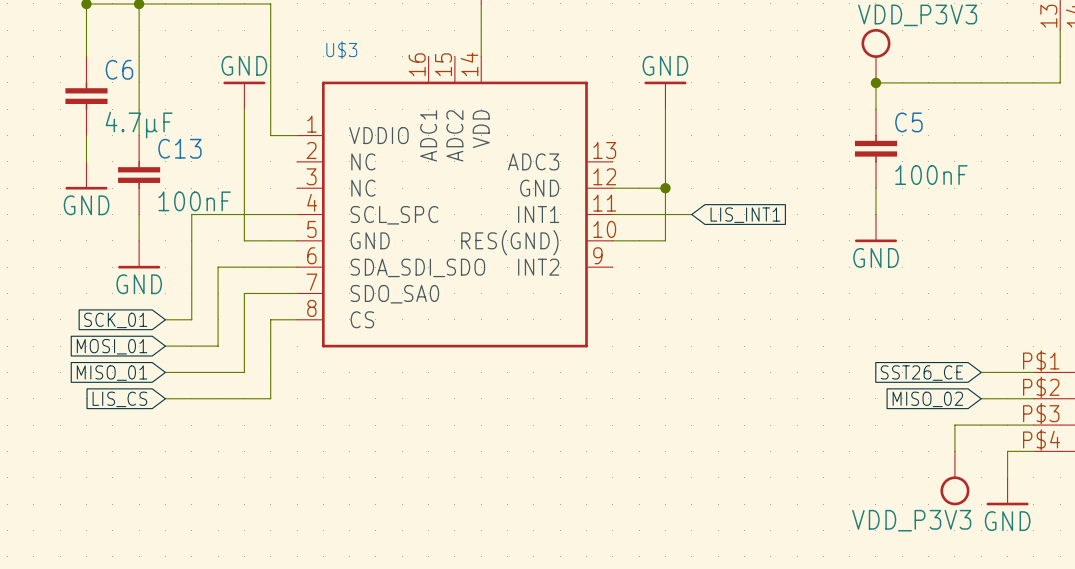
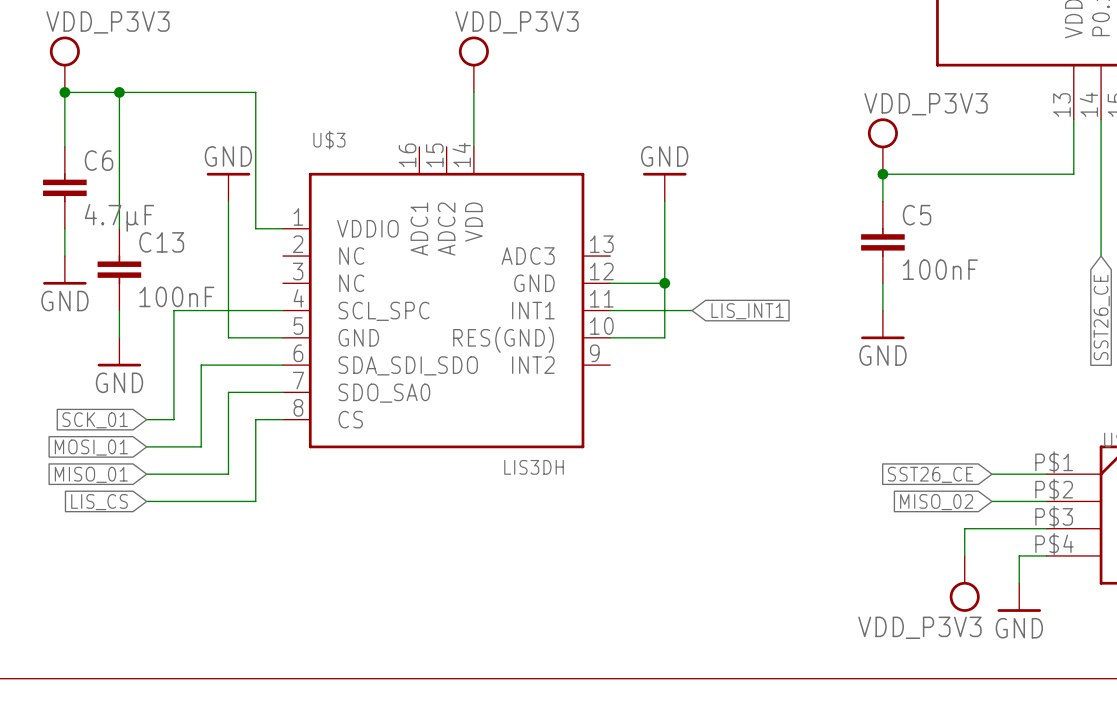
U$3 value: none -> LIS3DH (534, 467)

